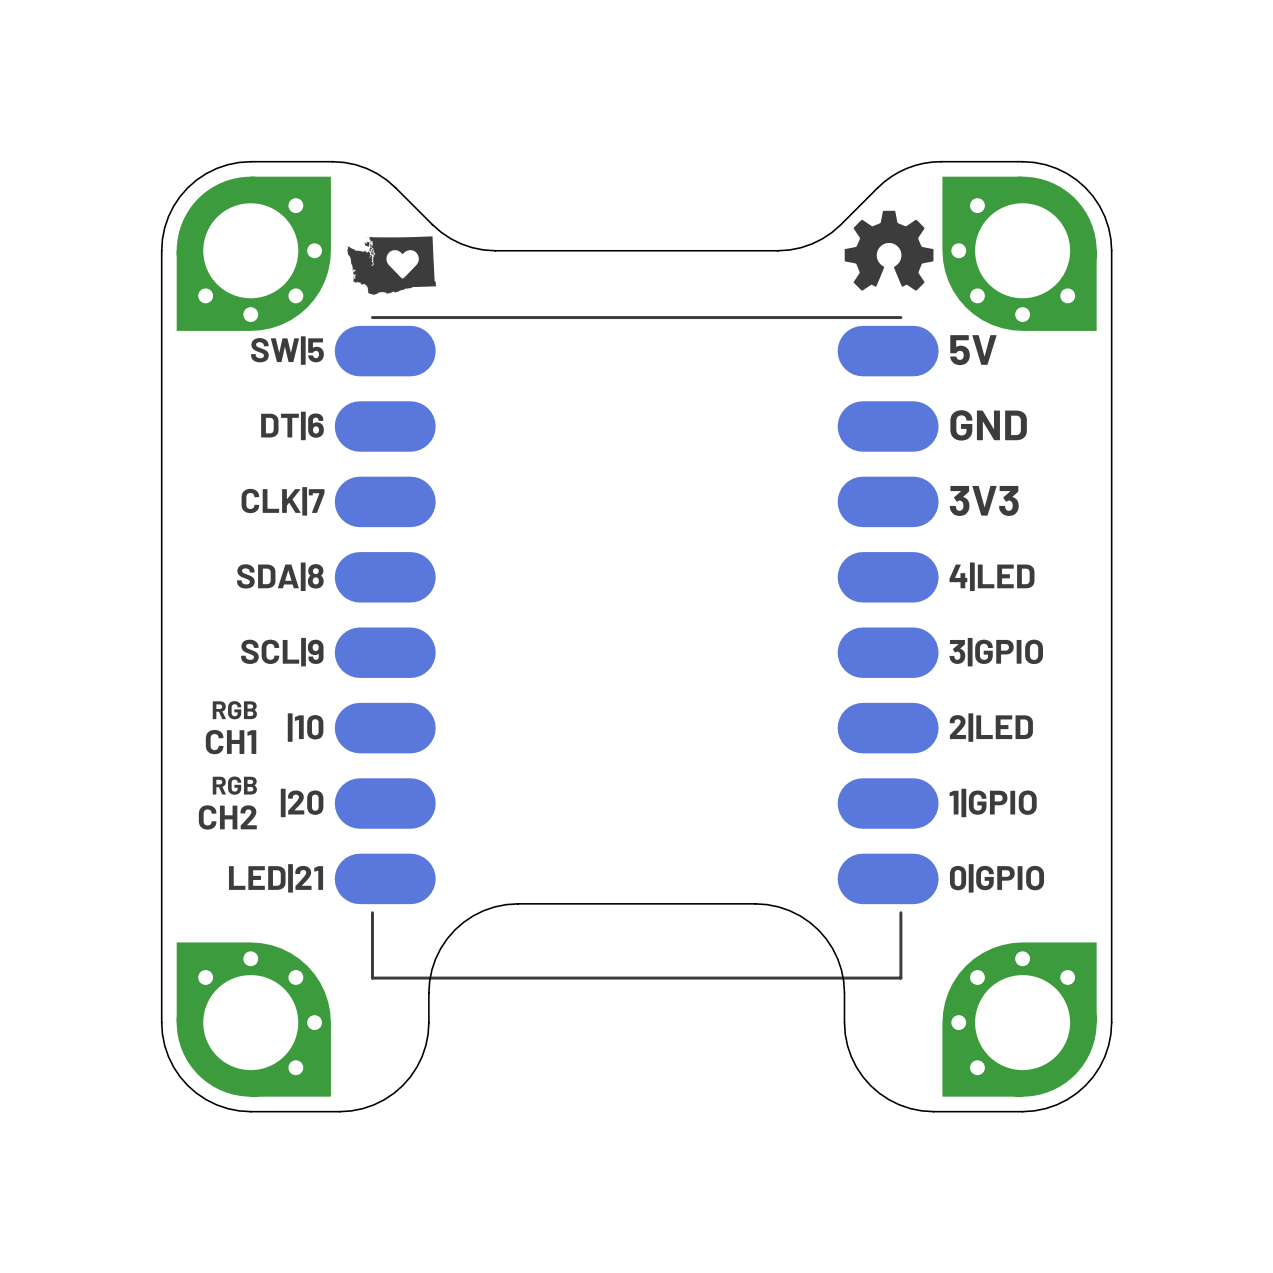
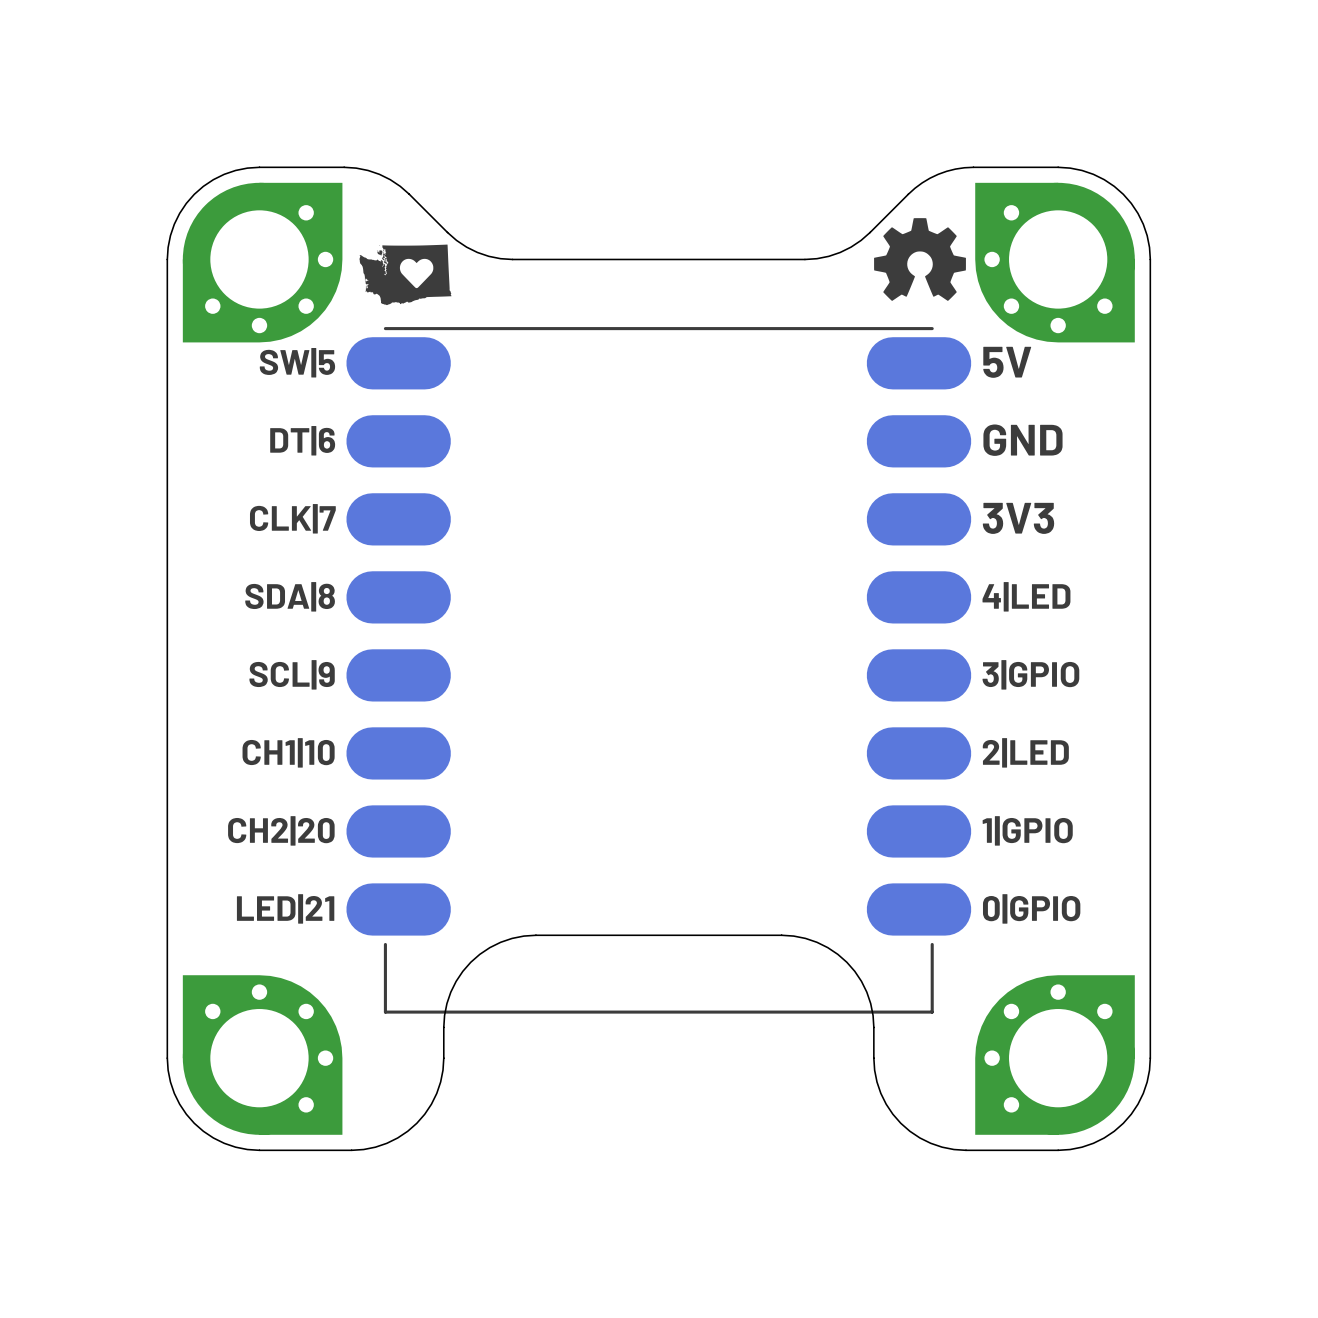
text: RGB (234, 710) -> none
text: |10 (305, 727) -> CH1|10 (288, 752)
text: CH1 (231, 742) -> none
text: RGB (234, 785) -> none
text: |20 (302, 802) -> CH2|20 (281, 830)
text: CH2 (227, 817) -> none

